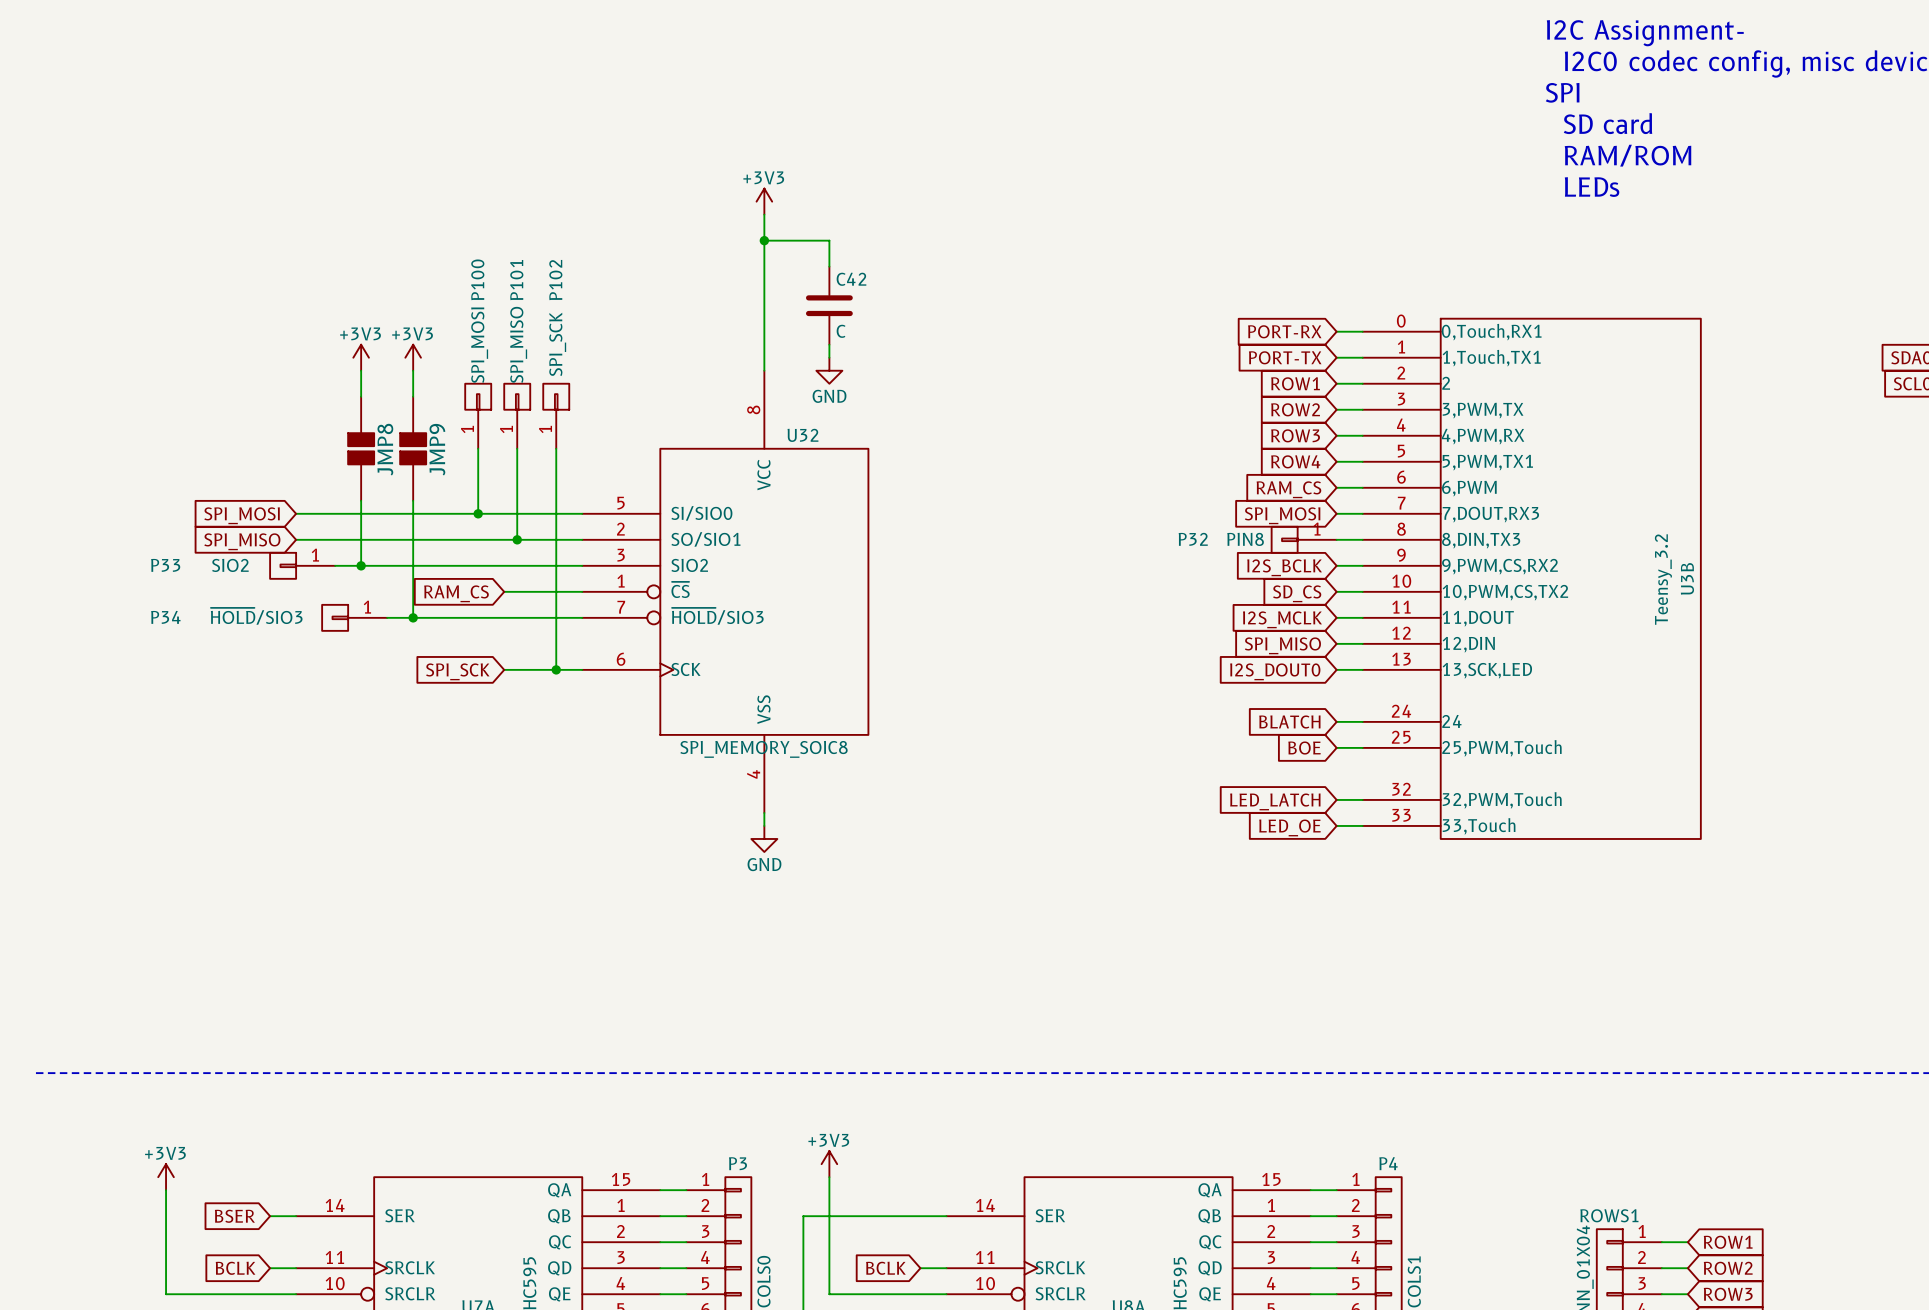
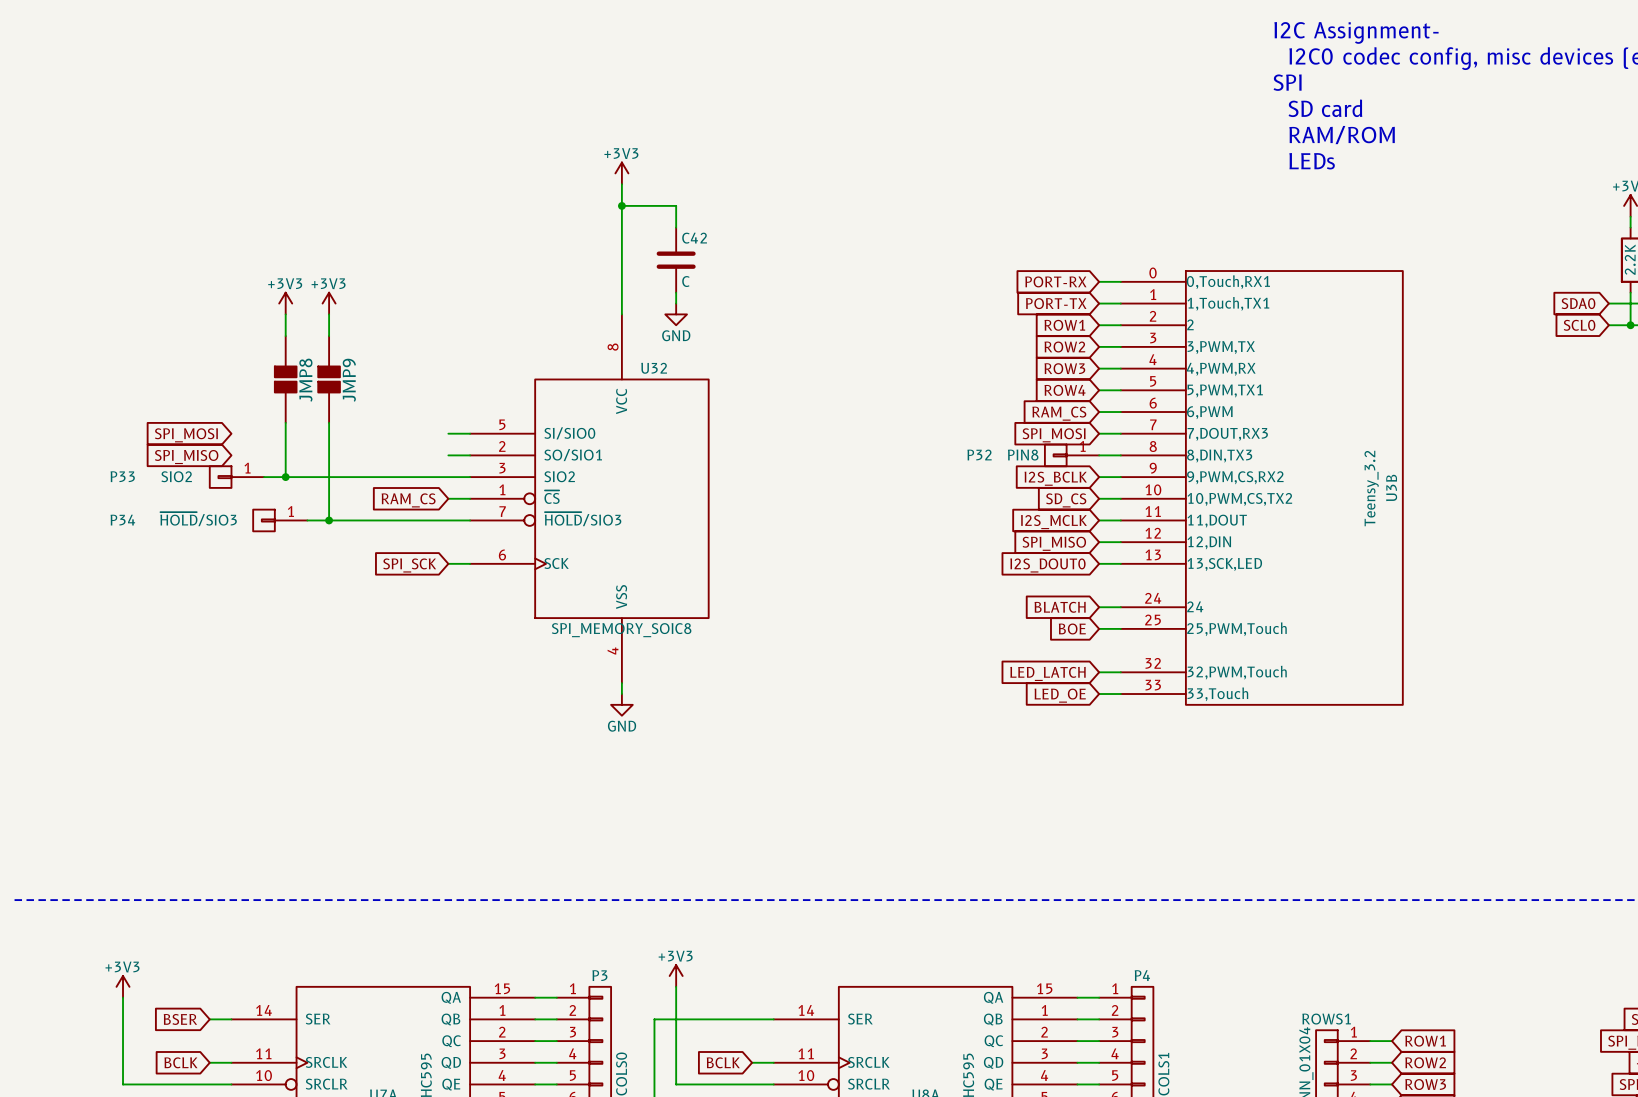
P100: SPI_MOSI (478, 416) -> none
P101: SPI_MISO (517, 416) -> none
P102: SPI_SCK (556, 416) -> none
wire: (478, 448) (478, 513) -> none
wire: (517, 448) (517, 539) -> none
wire: (556, 448) (556, 669) (504, 669) -> none
wire: (296, 513) (556, 513) -> none
junction: (478, 513) -> none
wire: (296, 539) (556, 539) -> none
junction: (517, 539) -> none
wire: (504, 591) (556, 591) -> none
global label position: RAM_CS (456, 593) -> RAM_CS (408, 500)
junction: (556, 669) -> none
global label position: SPI_SCK (457, 671) -> SPI_SCK (409, 565)

